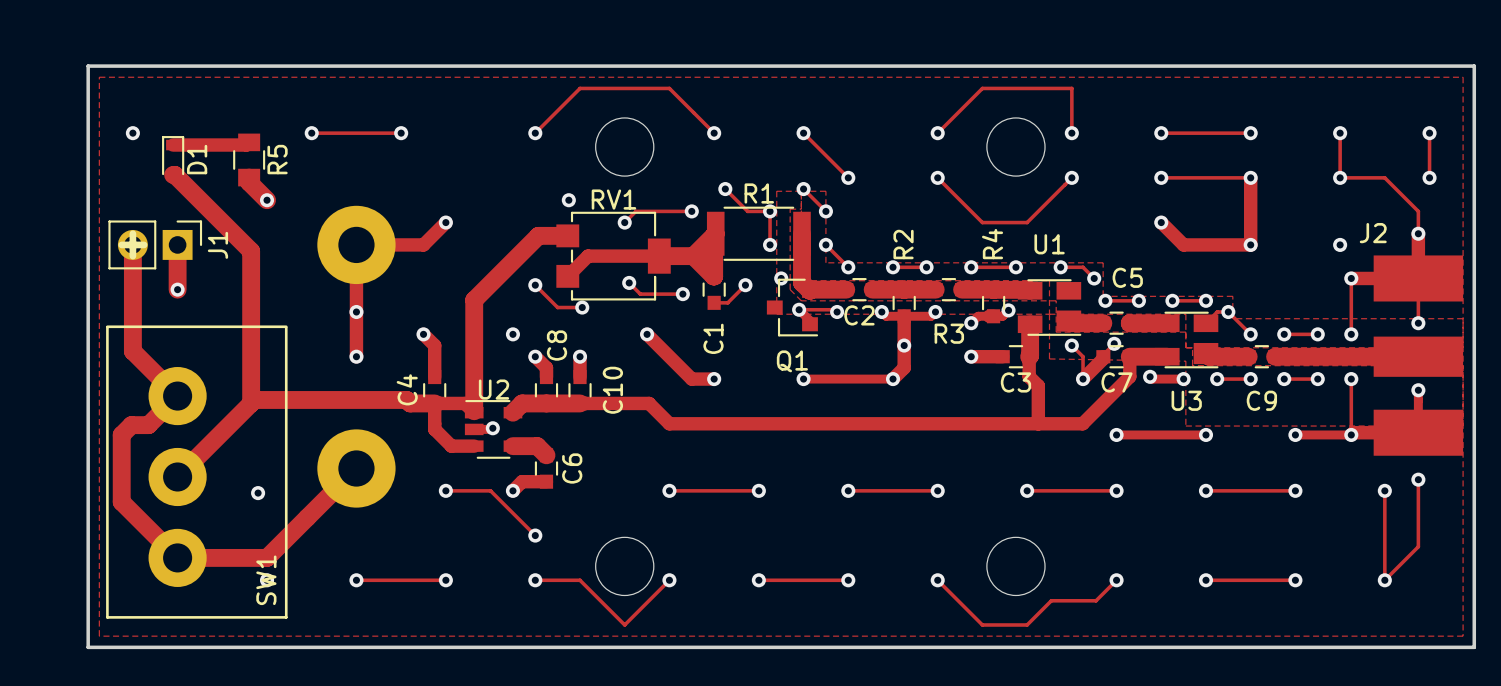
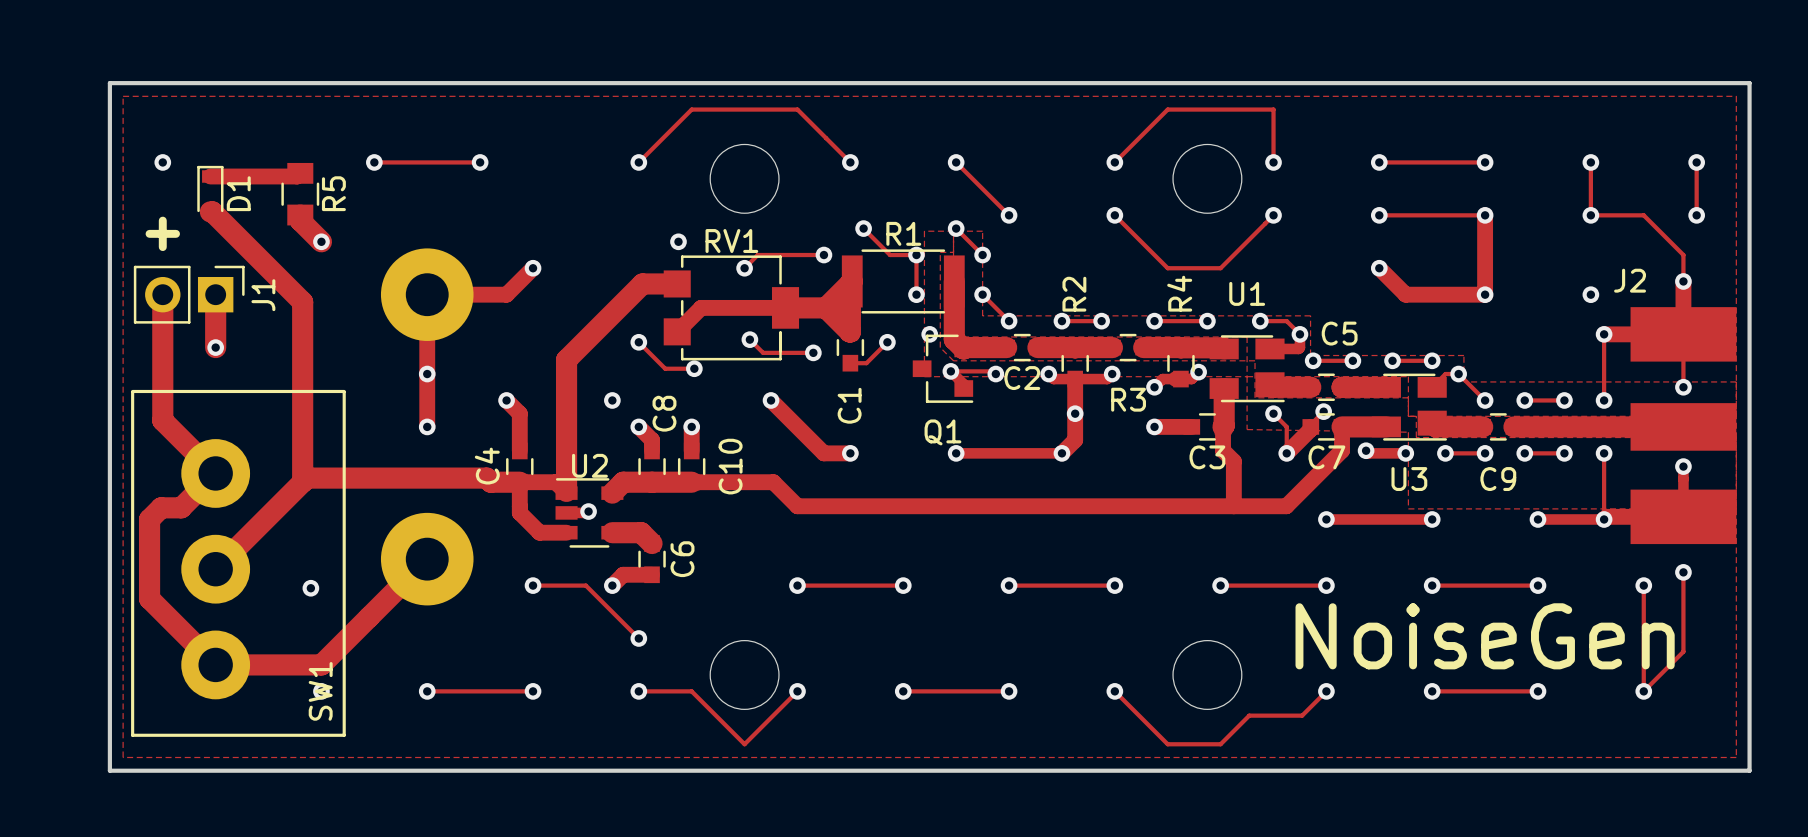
line: (132, 233) (132, 256) -> (162, 220) (162, 247)
line: (121, 244) (144, 244) -> (149, 233) (176, 233)
track: none -> (1299, 334) (1298, 348) (1269, 348)
text: none -> NoiseGen (1485, 636)

